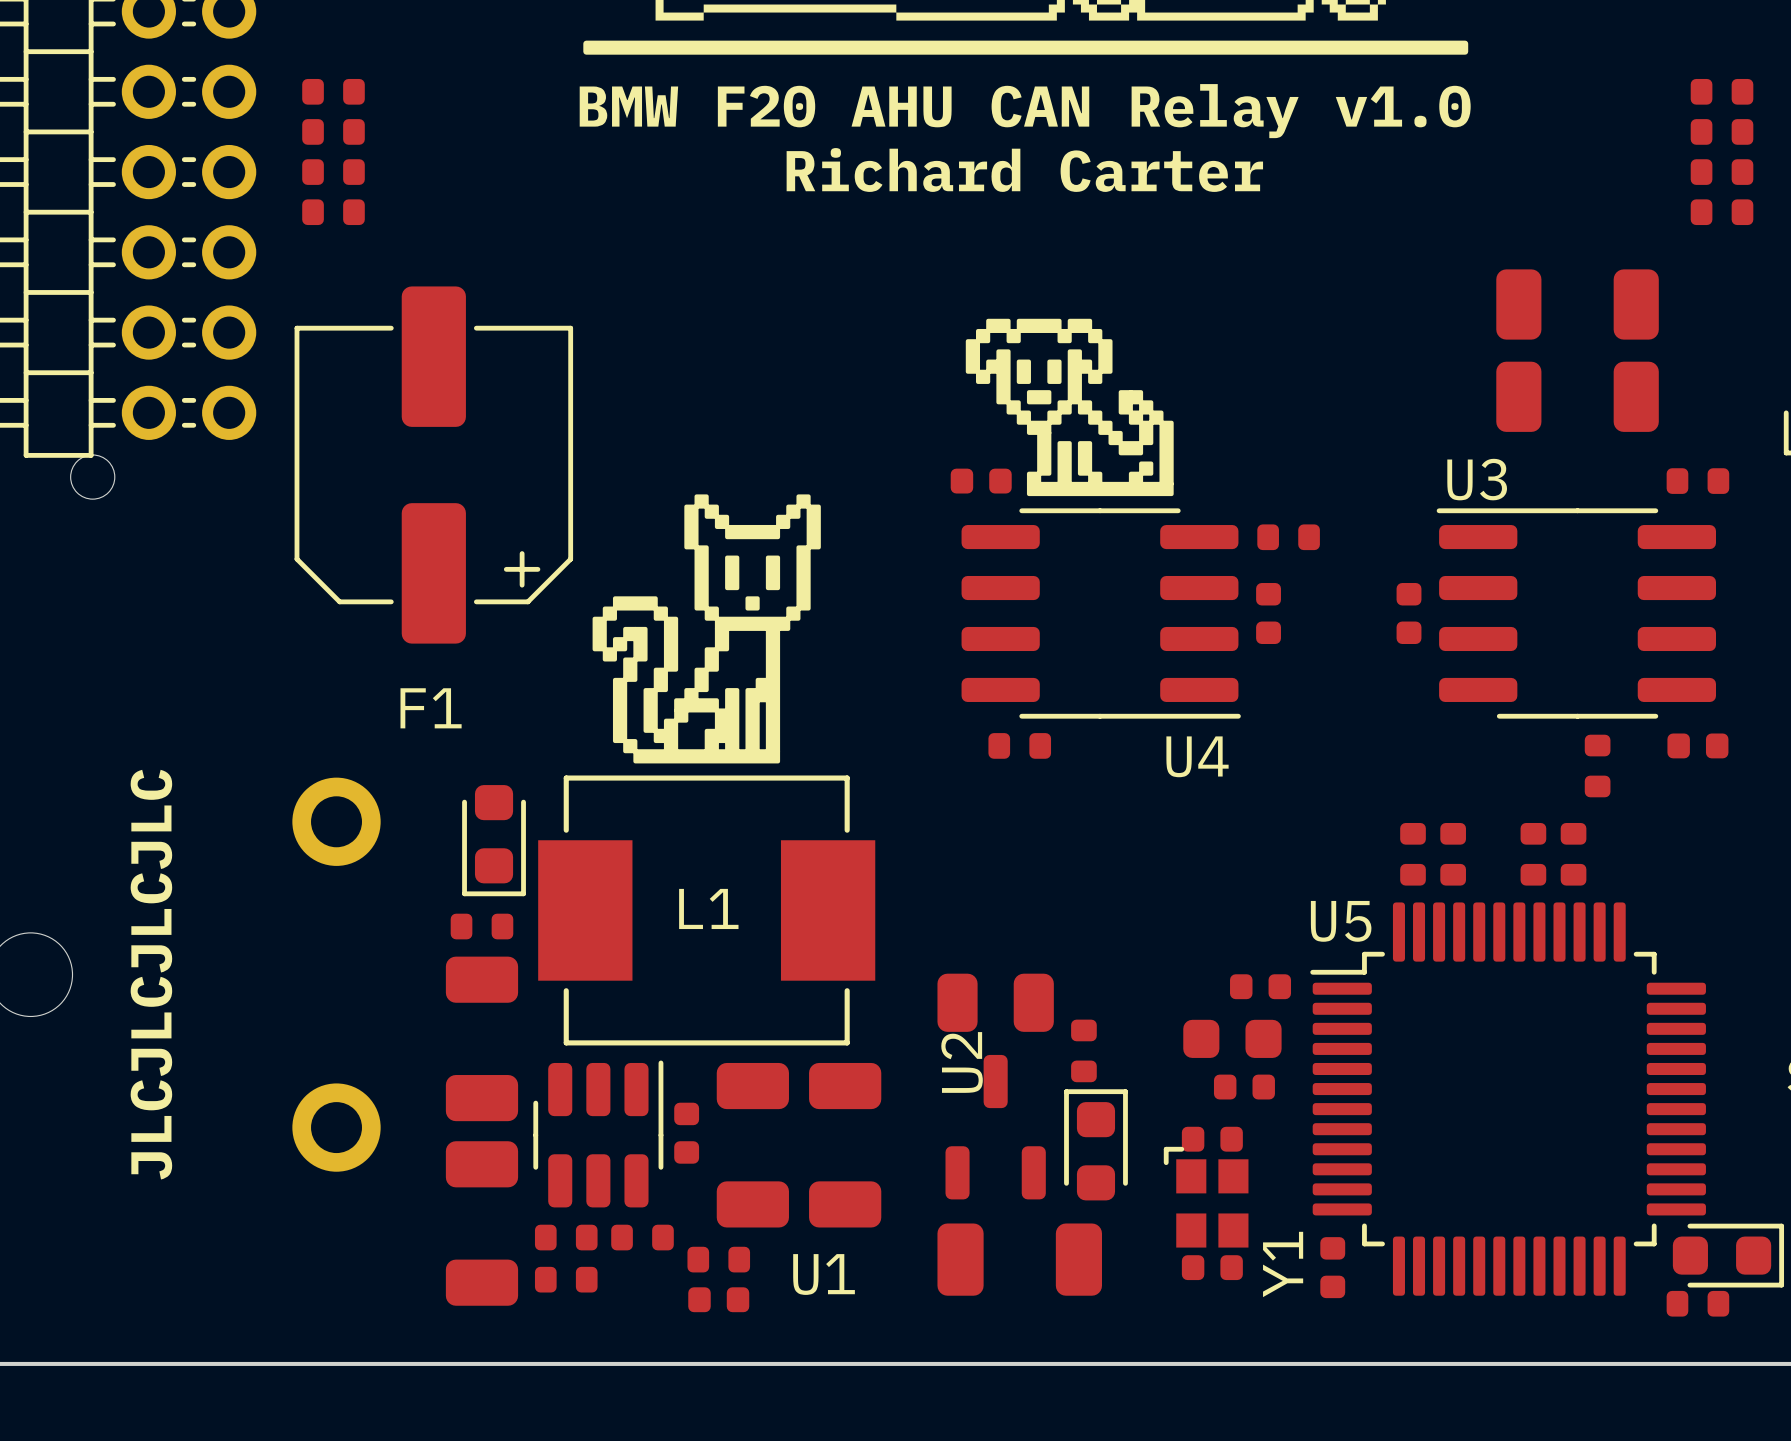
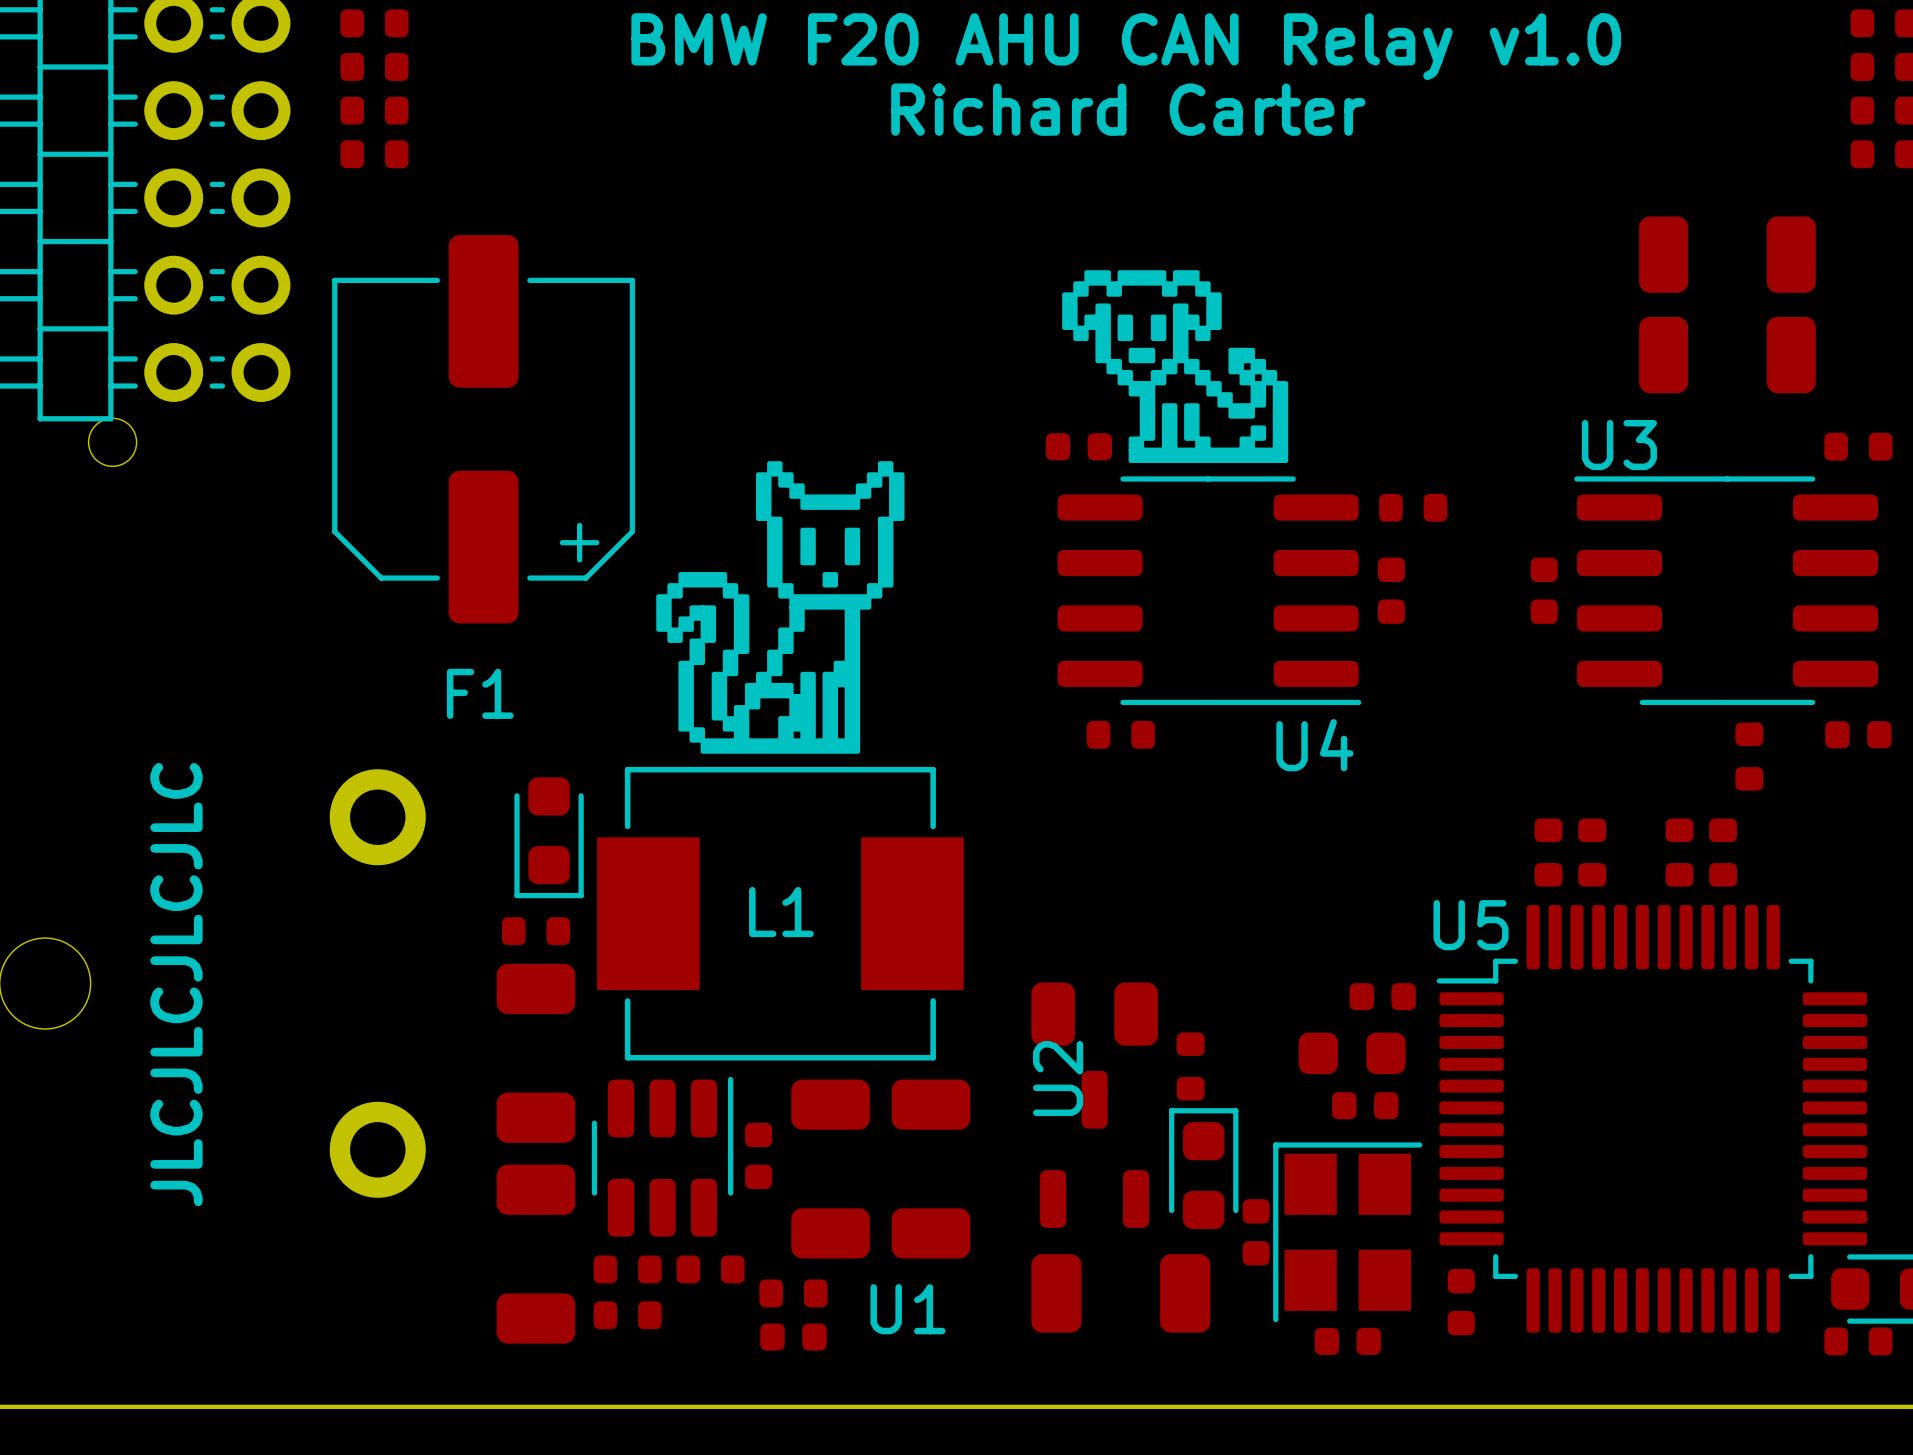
part: (1212, 1139) -> none
Y1: (1206, 1197) -> none
part: none -> (1256, 1232)
part: none -> (1347, 1232)
part position: (1212, 1267) -> (1347, 1341)

